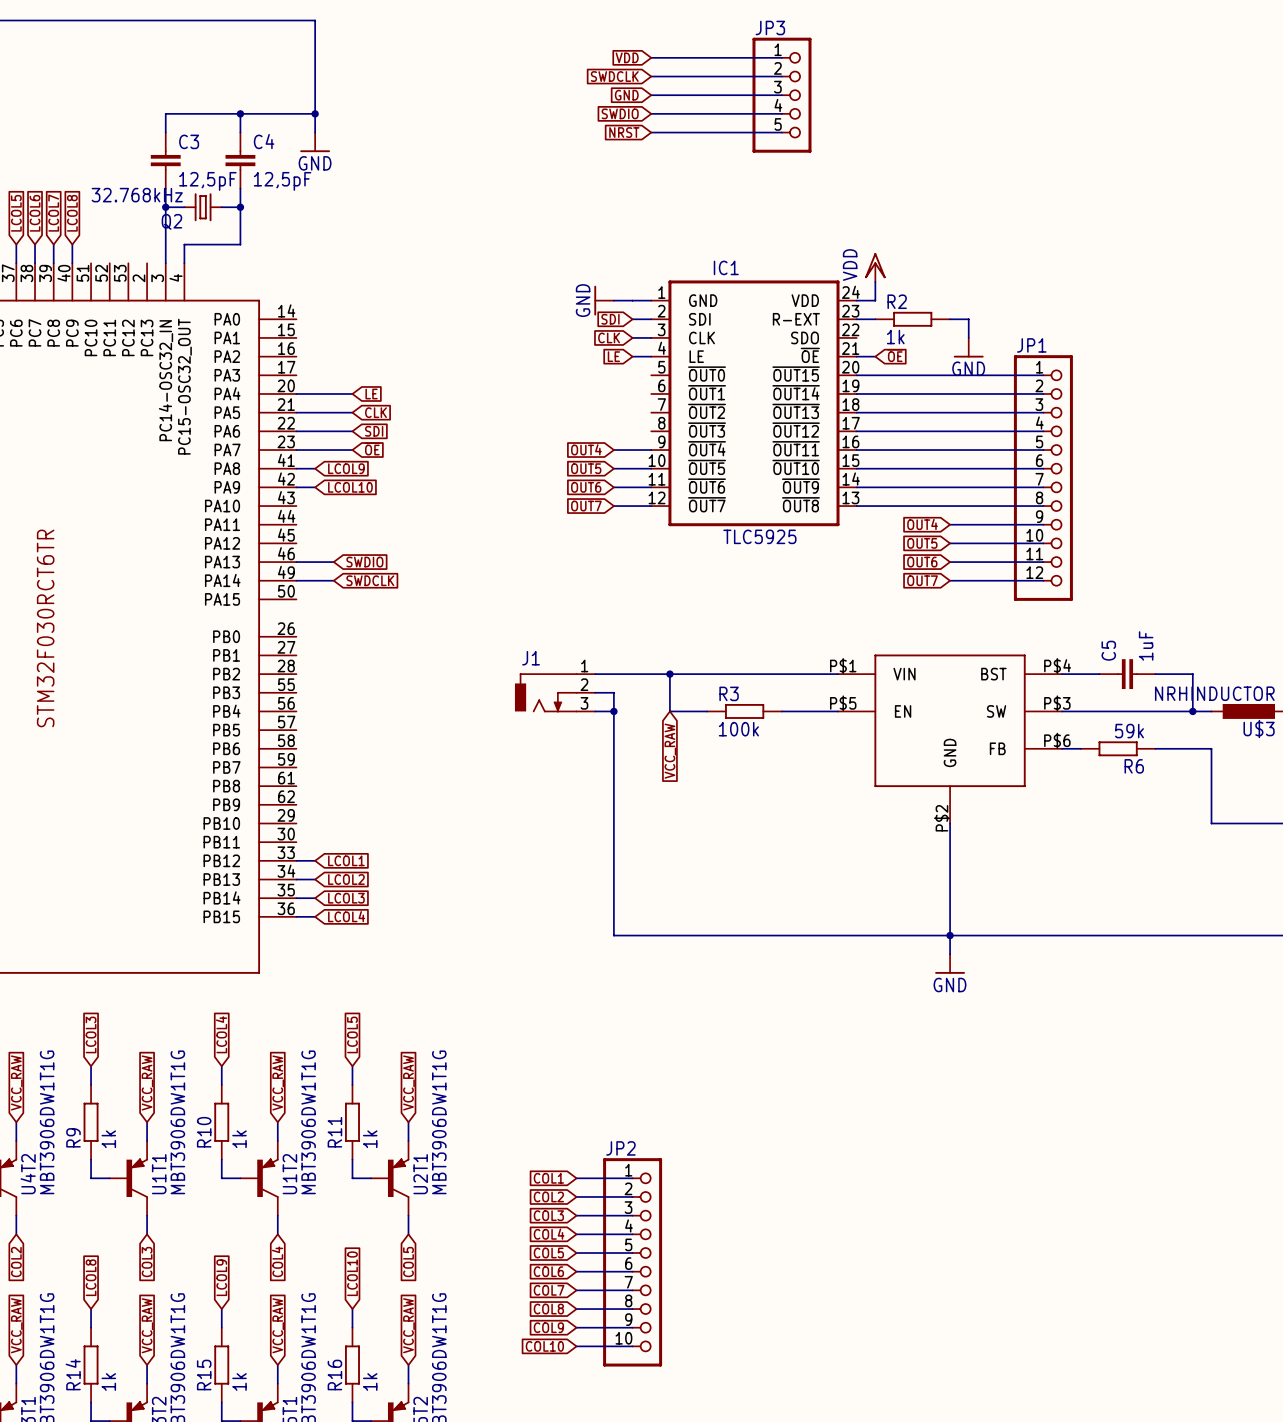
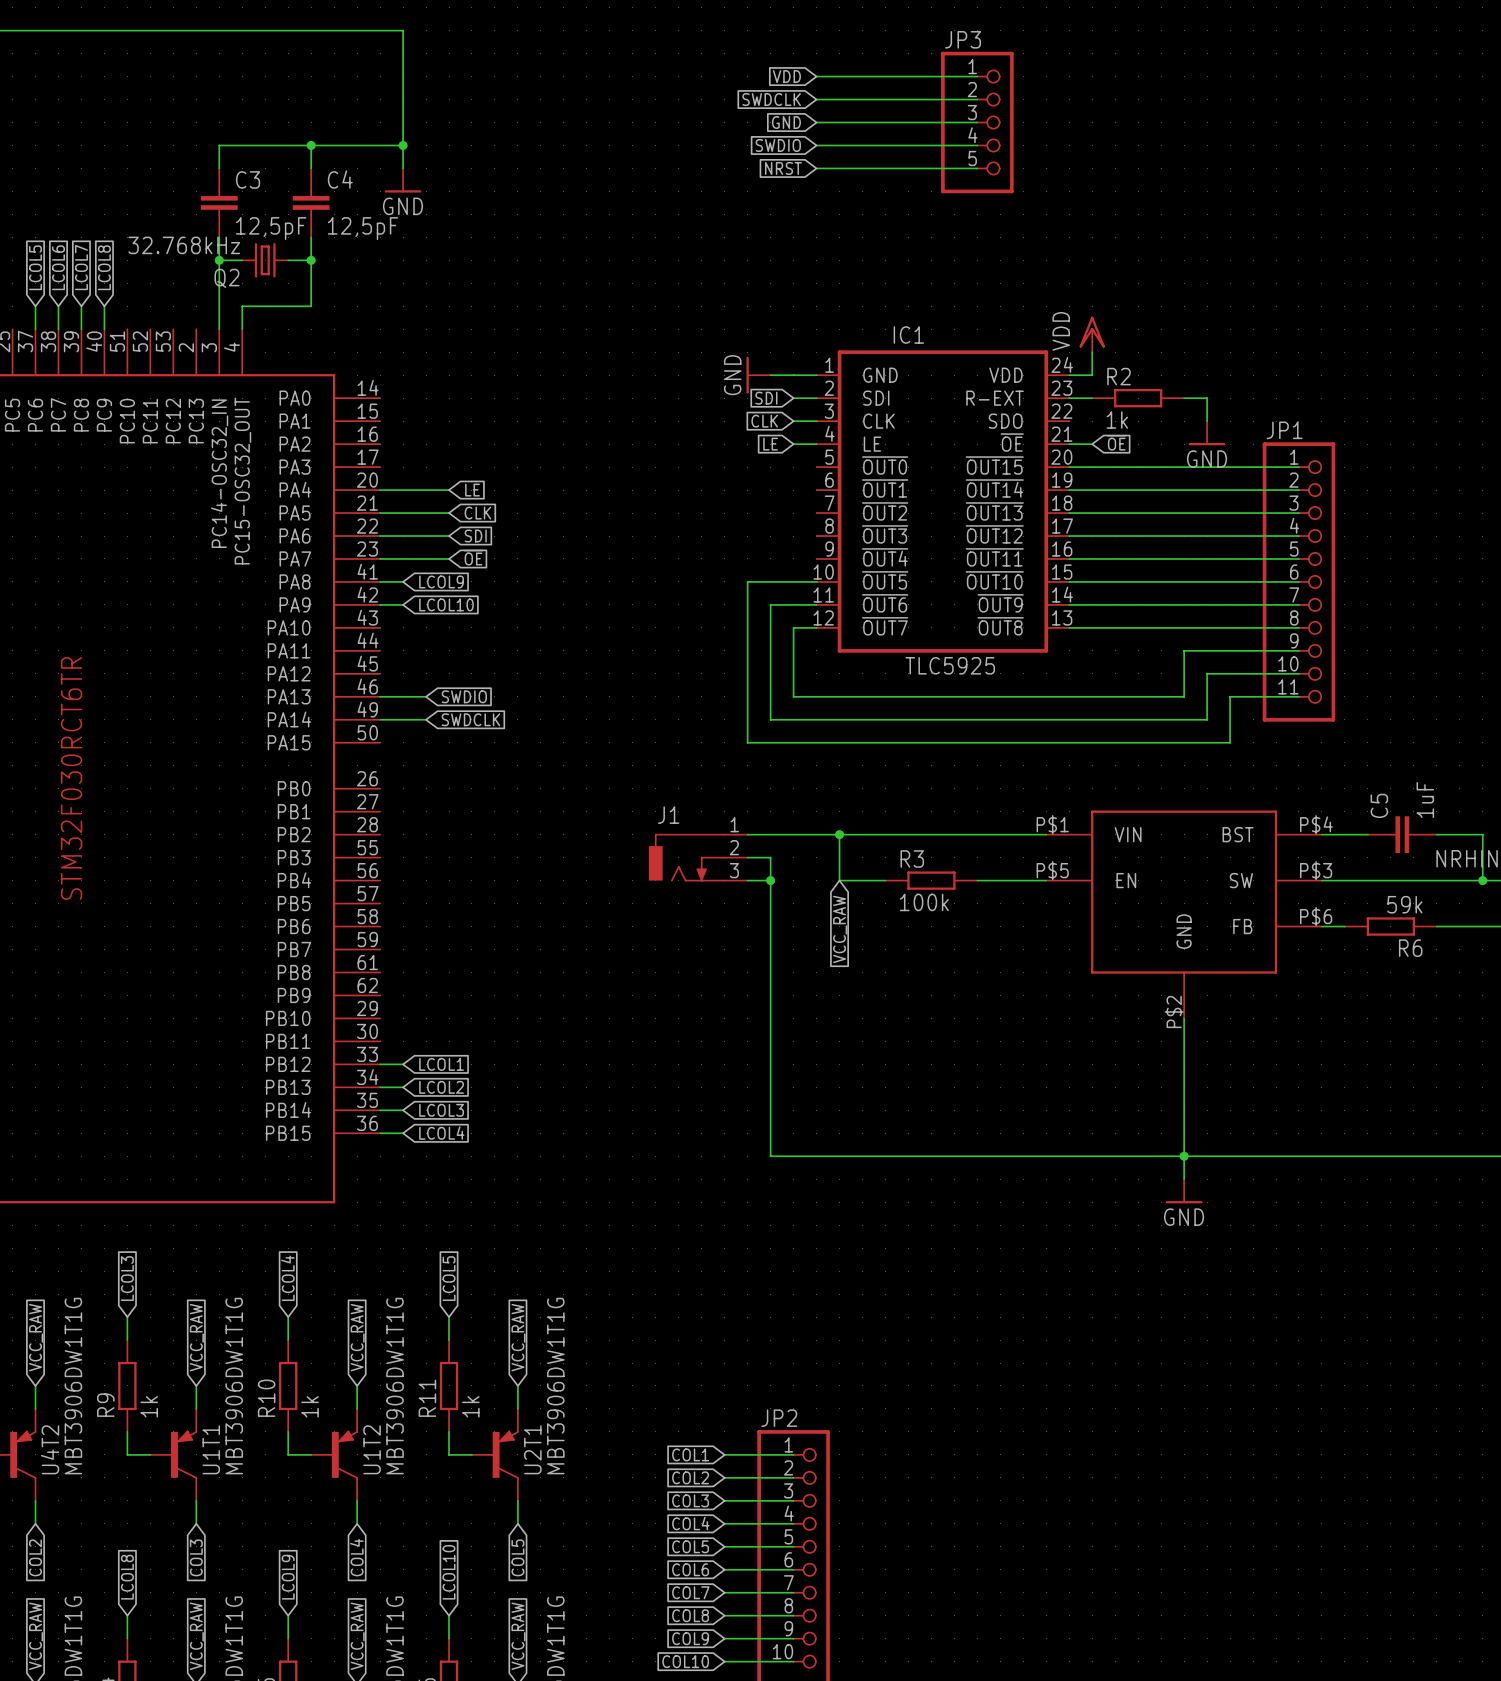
JP1 symbol: [1013, 355, 1073, 601] -> [1262, 442, 1336, 722]
global label: OUT4 (586, 449) -> none
wire: (613, 450) (651, 450) -> none
global label: OUT5 (586, 468) -> none
global label: OUT6 (586, 487) -> none
wire: none -> (770, 604) (770, 719) (1184, 719)
global label: OUT7 (586, 506) -> none
wire: (613, 506) (632, 506) -> (1184, 650) (1184, 696) (793, 696) (793, 627)
global label: OUT4 (922, 524) -> none
global label: OUT5 (922, 543) -> none
wire: (950, 543) (968, 543) -> (1207, 719) (1207, 673)
global label: OUT6 (922, 562) -> none
wire: (950, 562) (987, 562) -> (770, 581) (747, 581) (747, 742) (1230, 742) (1230, 696)
global label: OUT7 (922, 580) -> none
wire: (968, 580) (1043, 580) -> none

